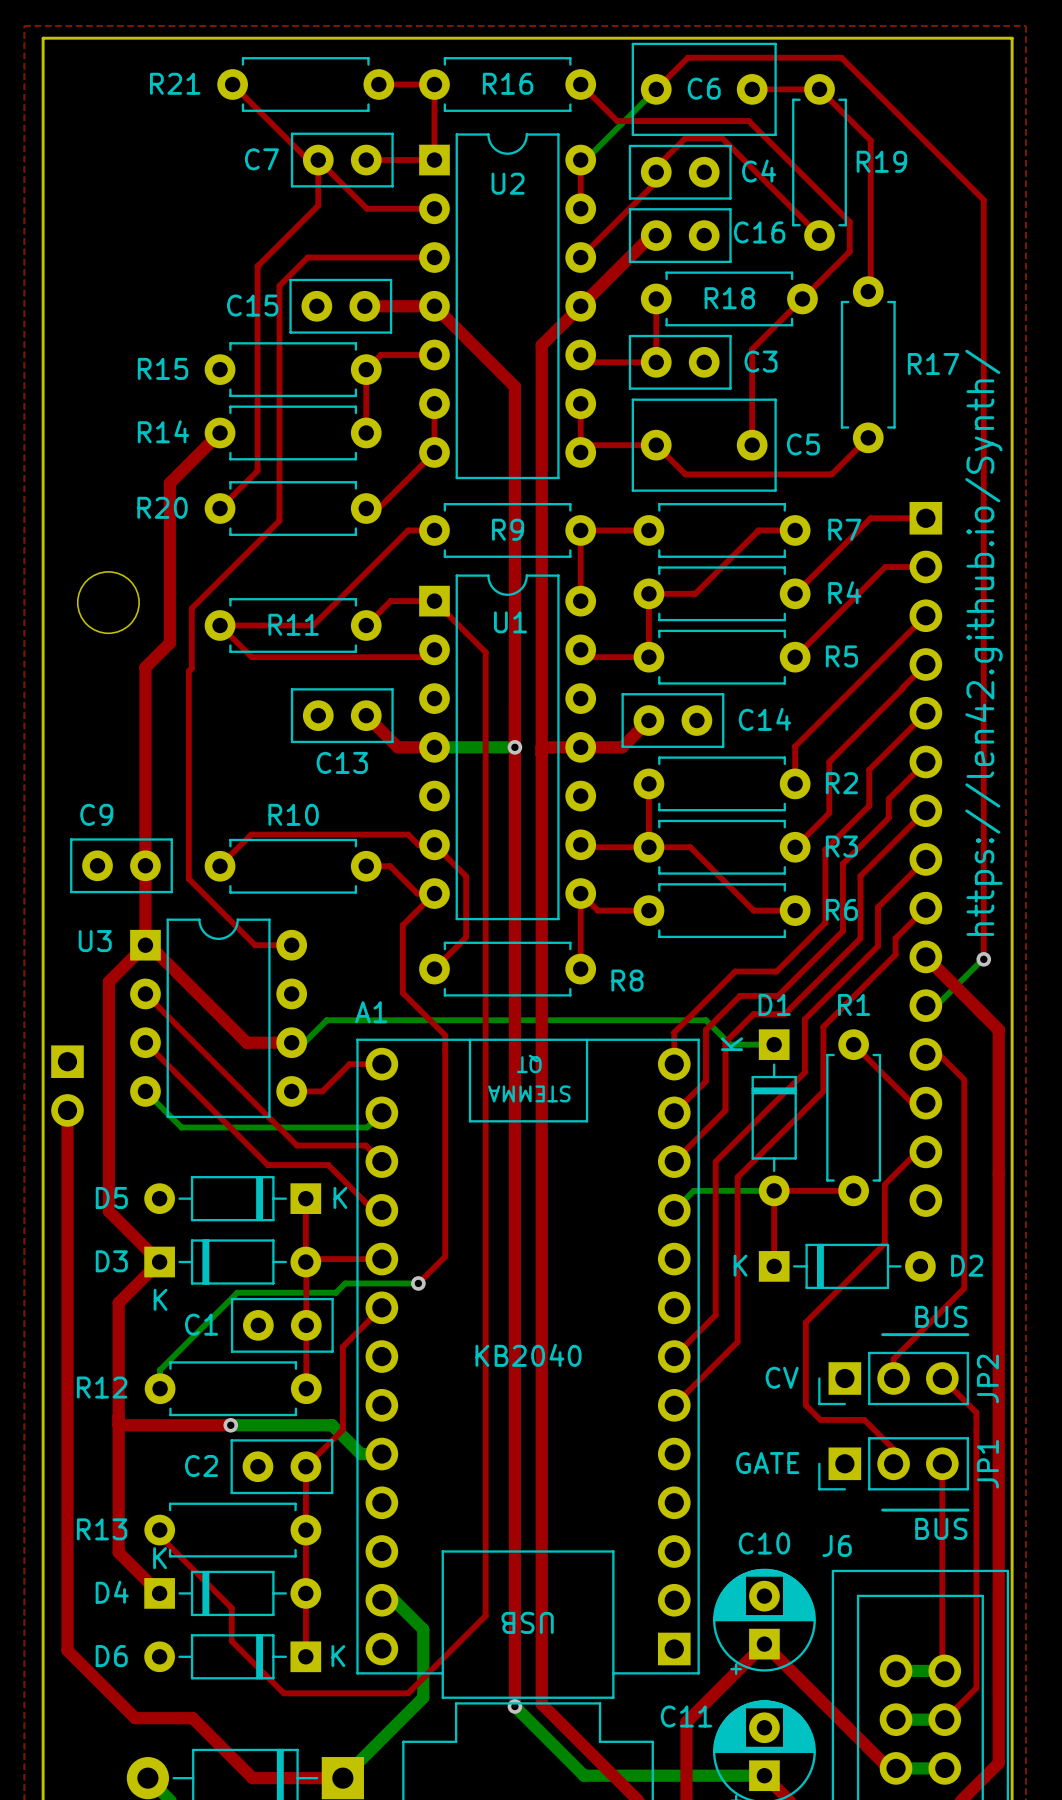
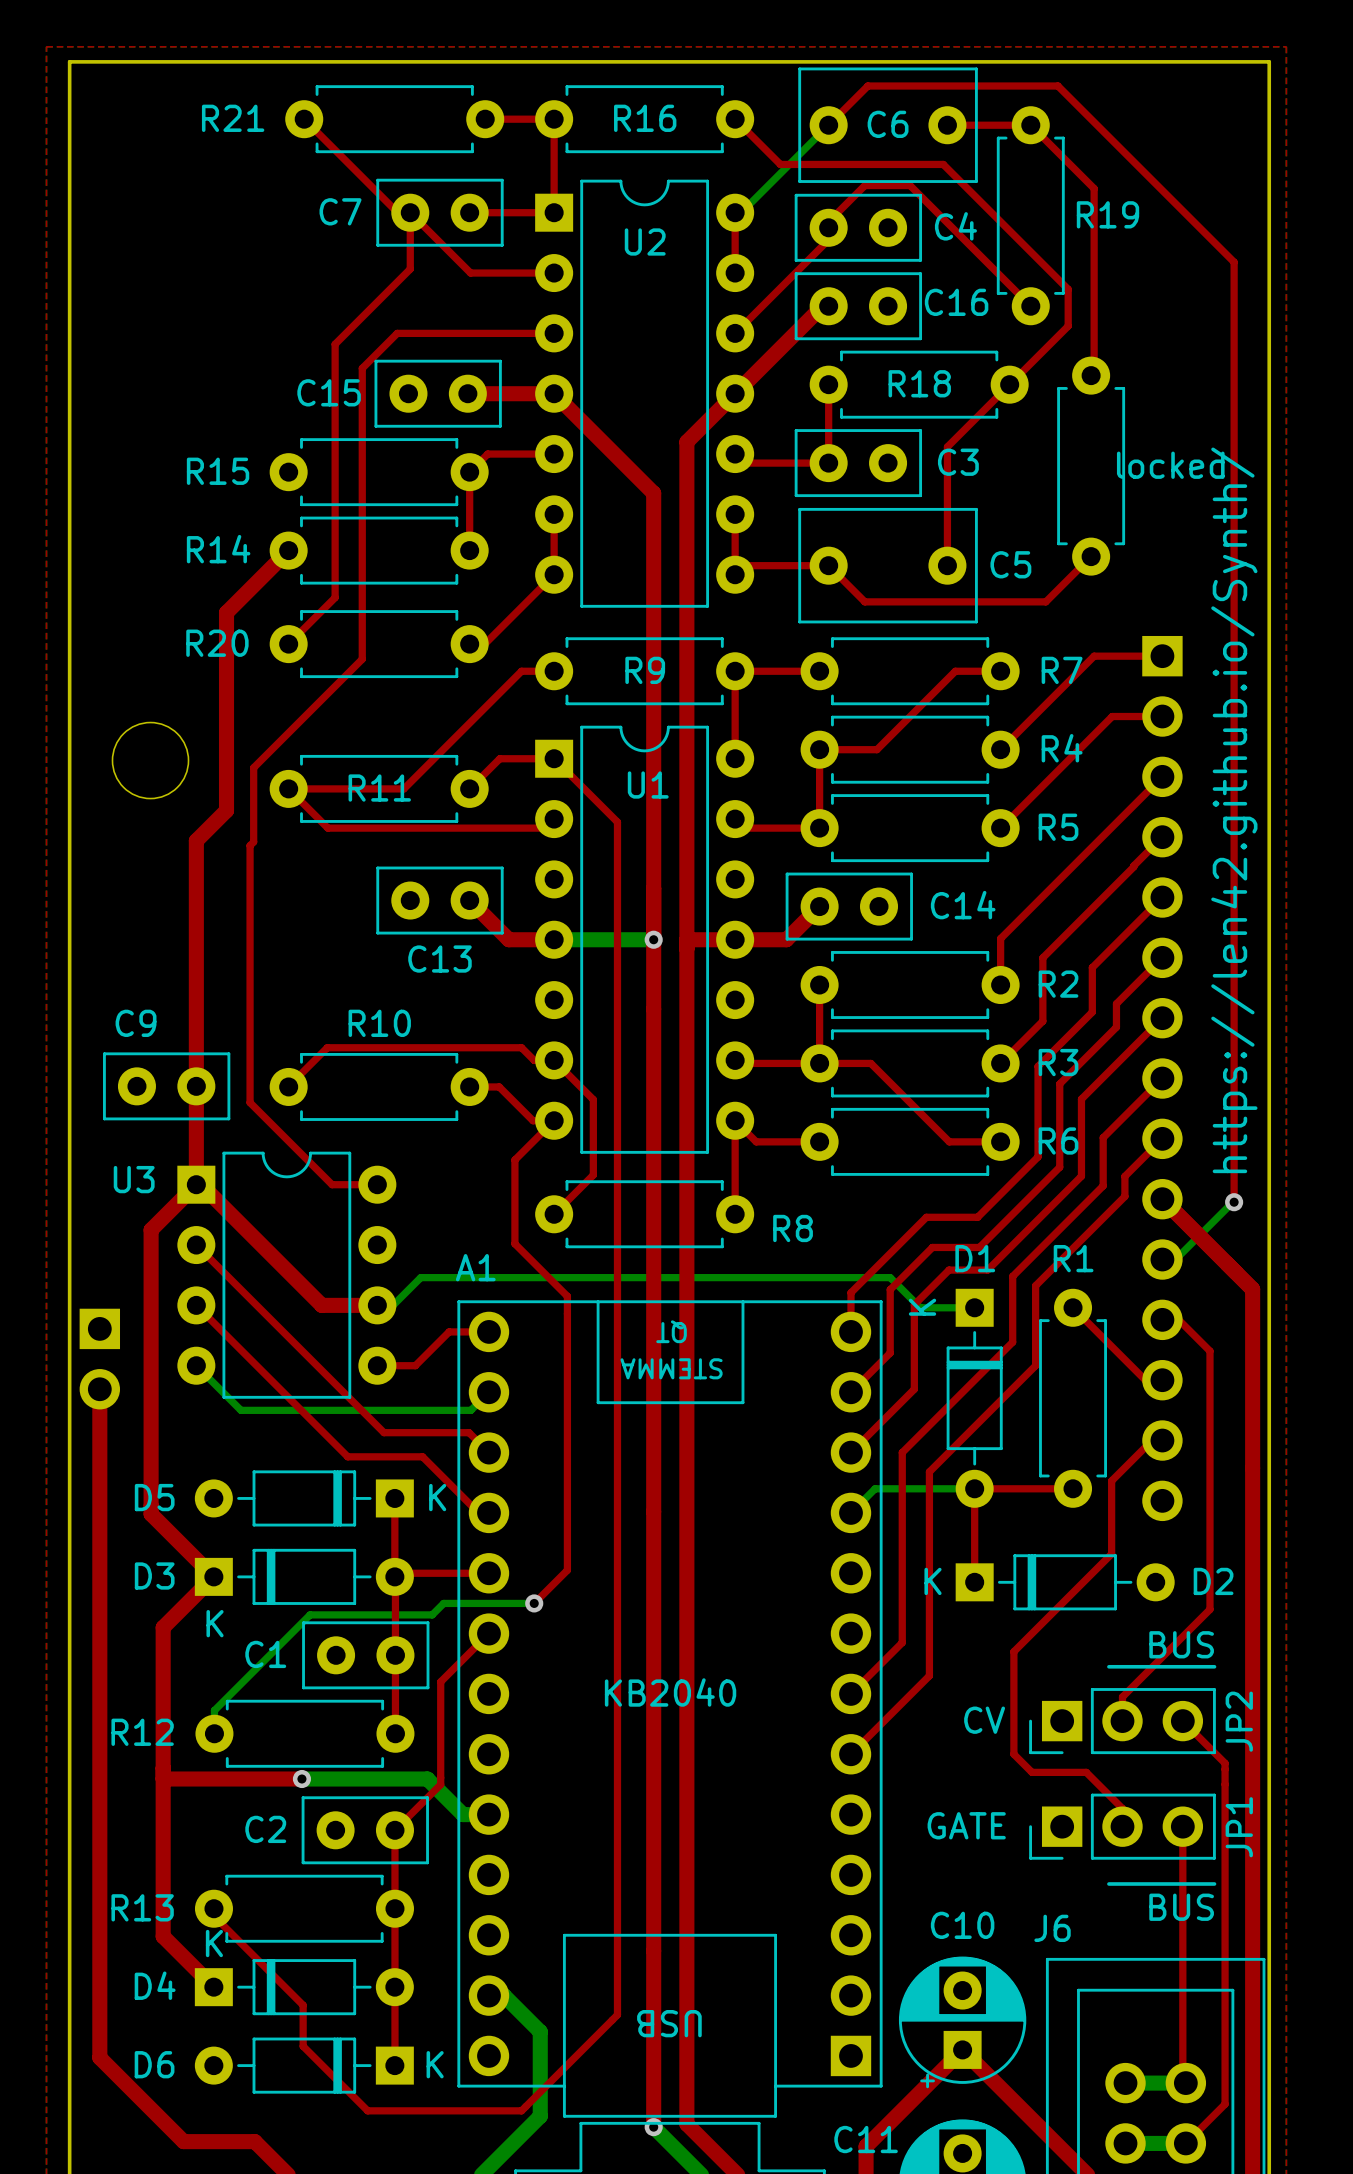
R17 name: R17 (933, 364) -> locked (1170, 465)

